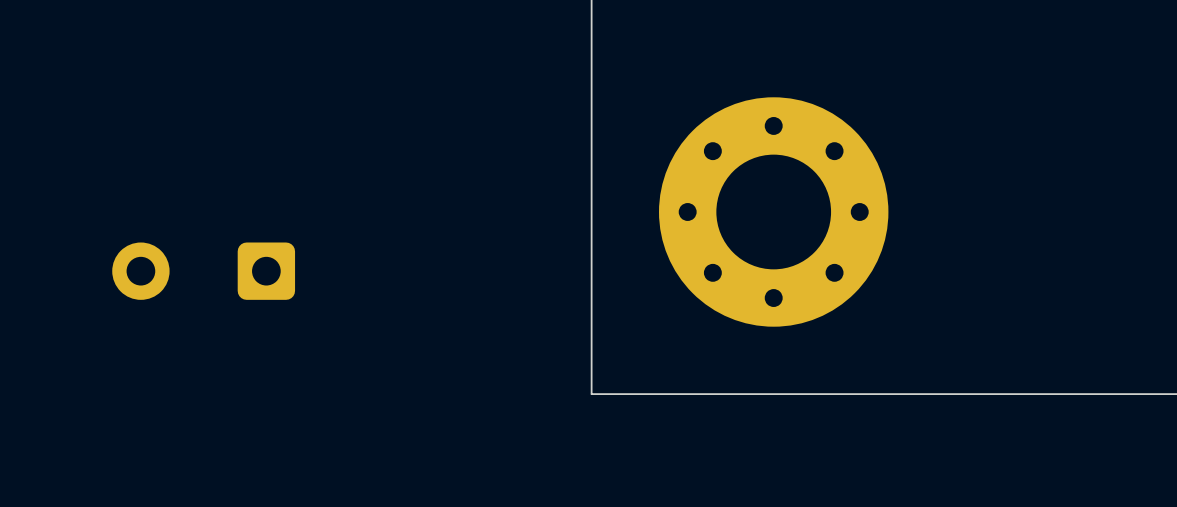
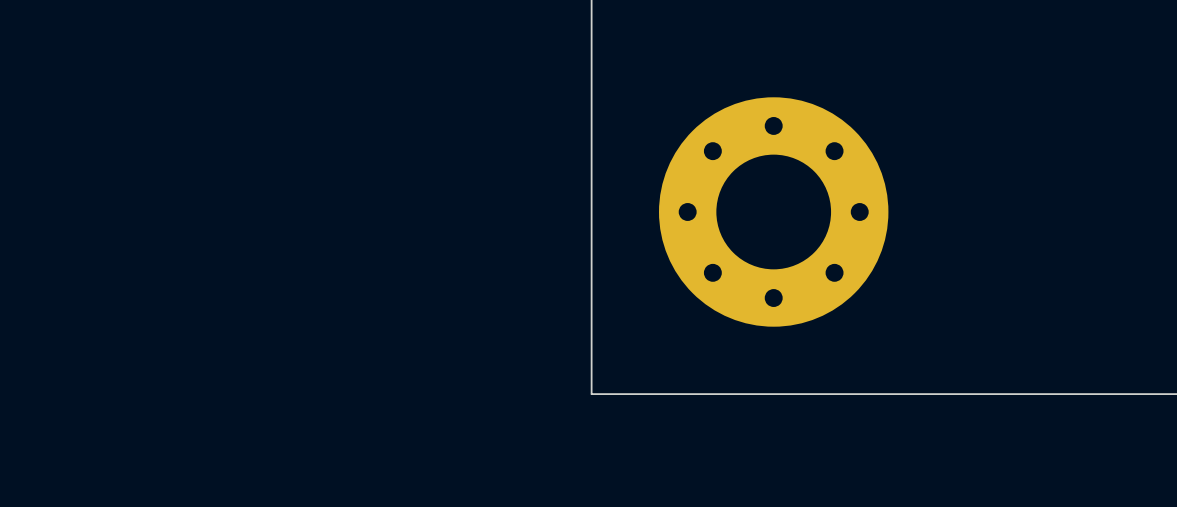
part: (203, 271) -> none

